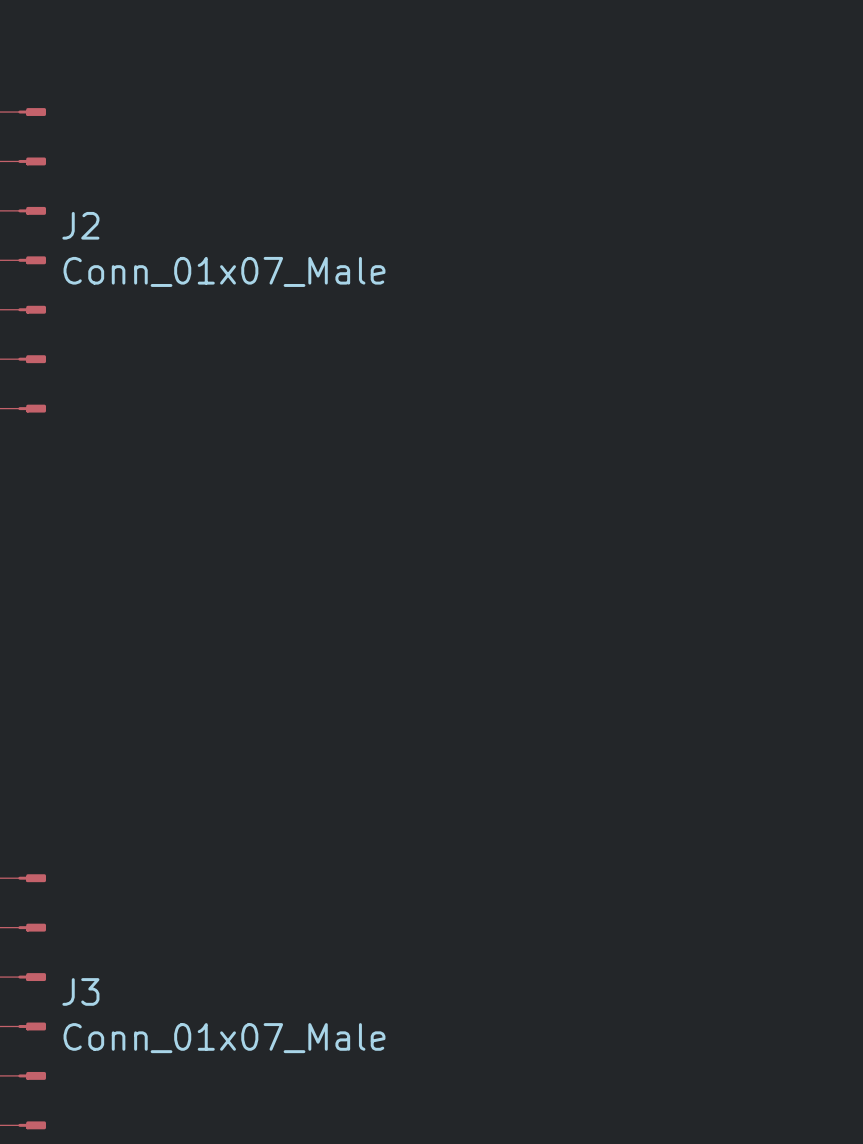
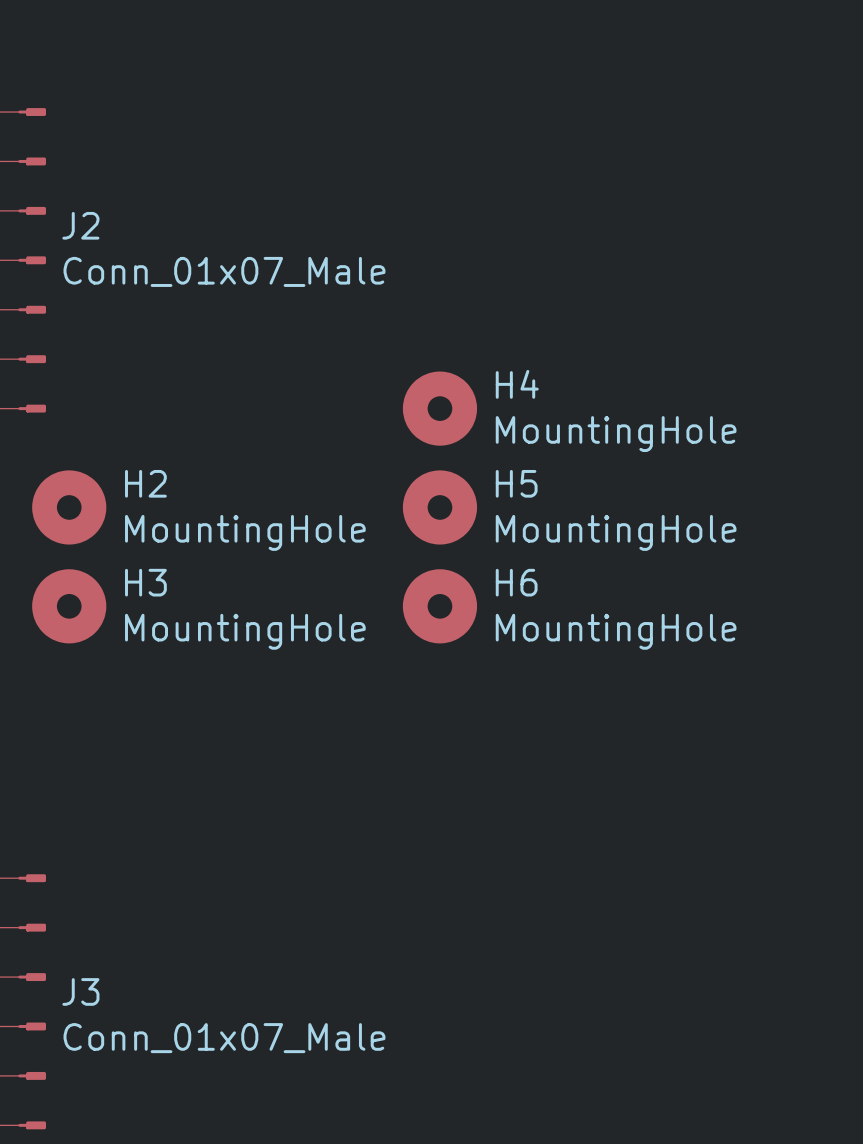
H4: none -> MountingHole (439, 408)
H2: none -> MountingHole (69, 507)
H5: none -> MountingHole (439, 507)
H3: none -> MountingHole (69, 606)
H6: none -> MountingHole (439, 606)

